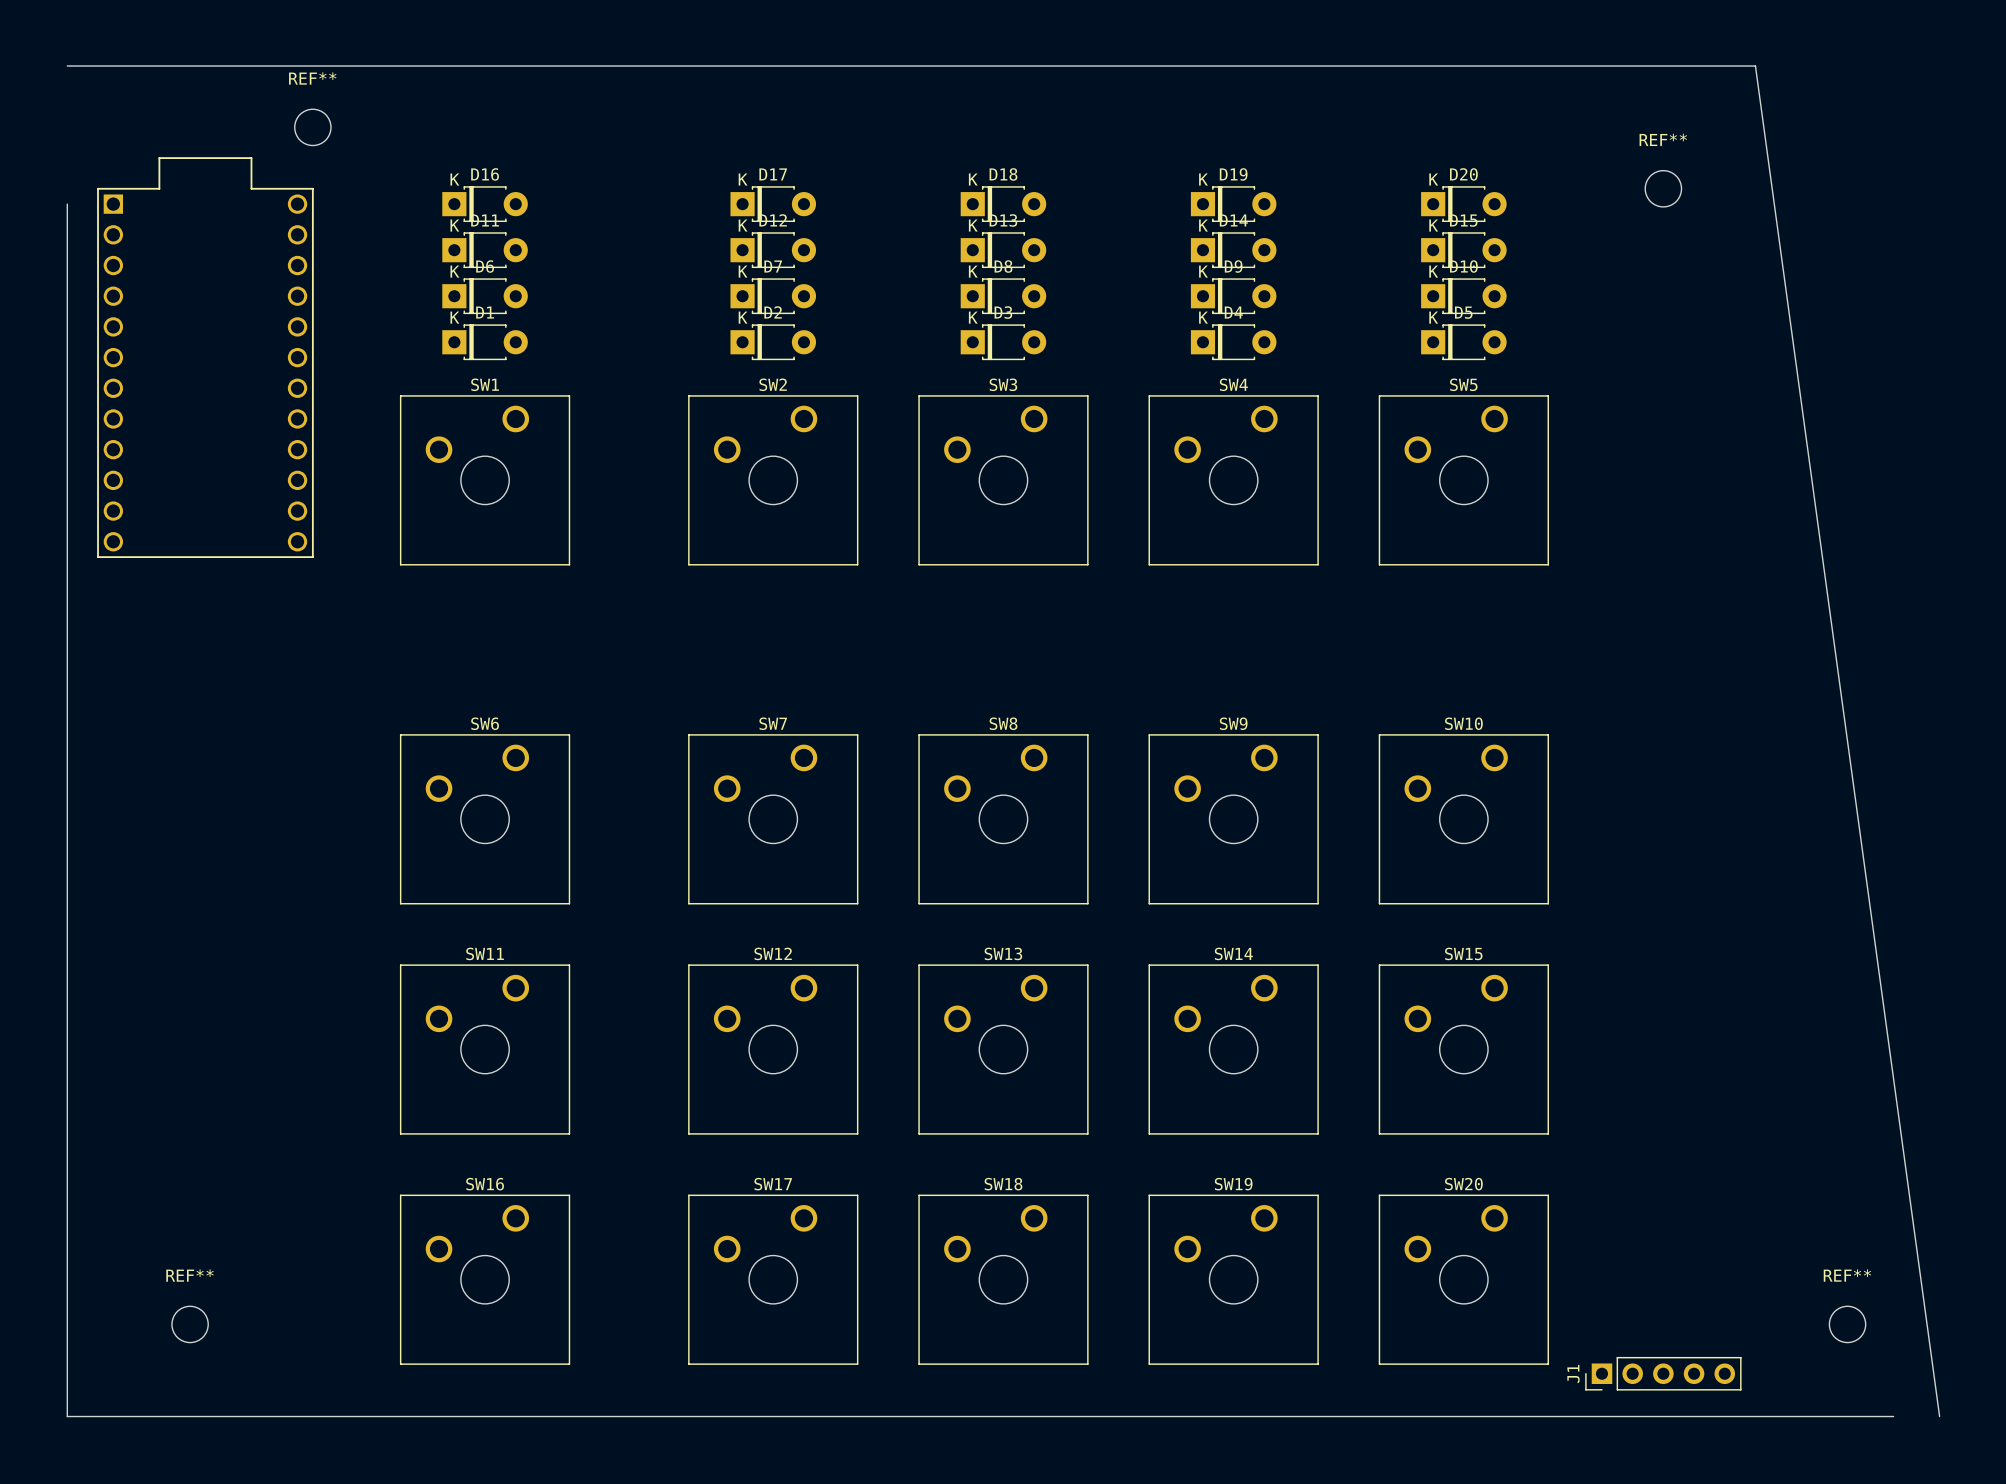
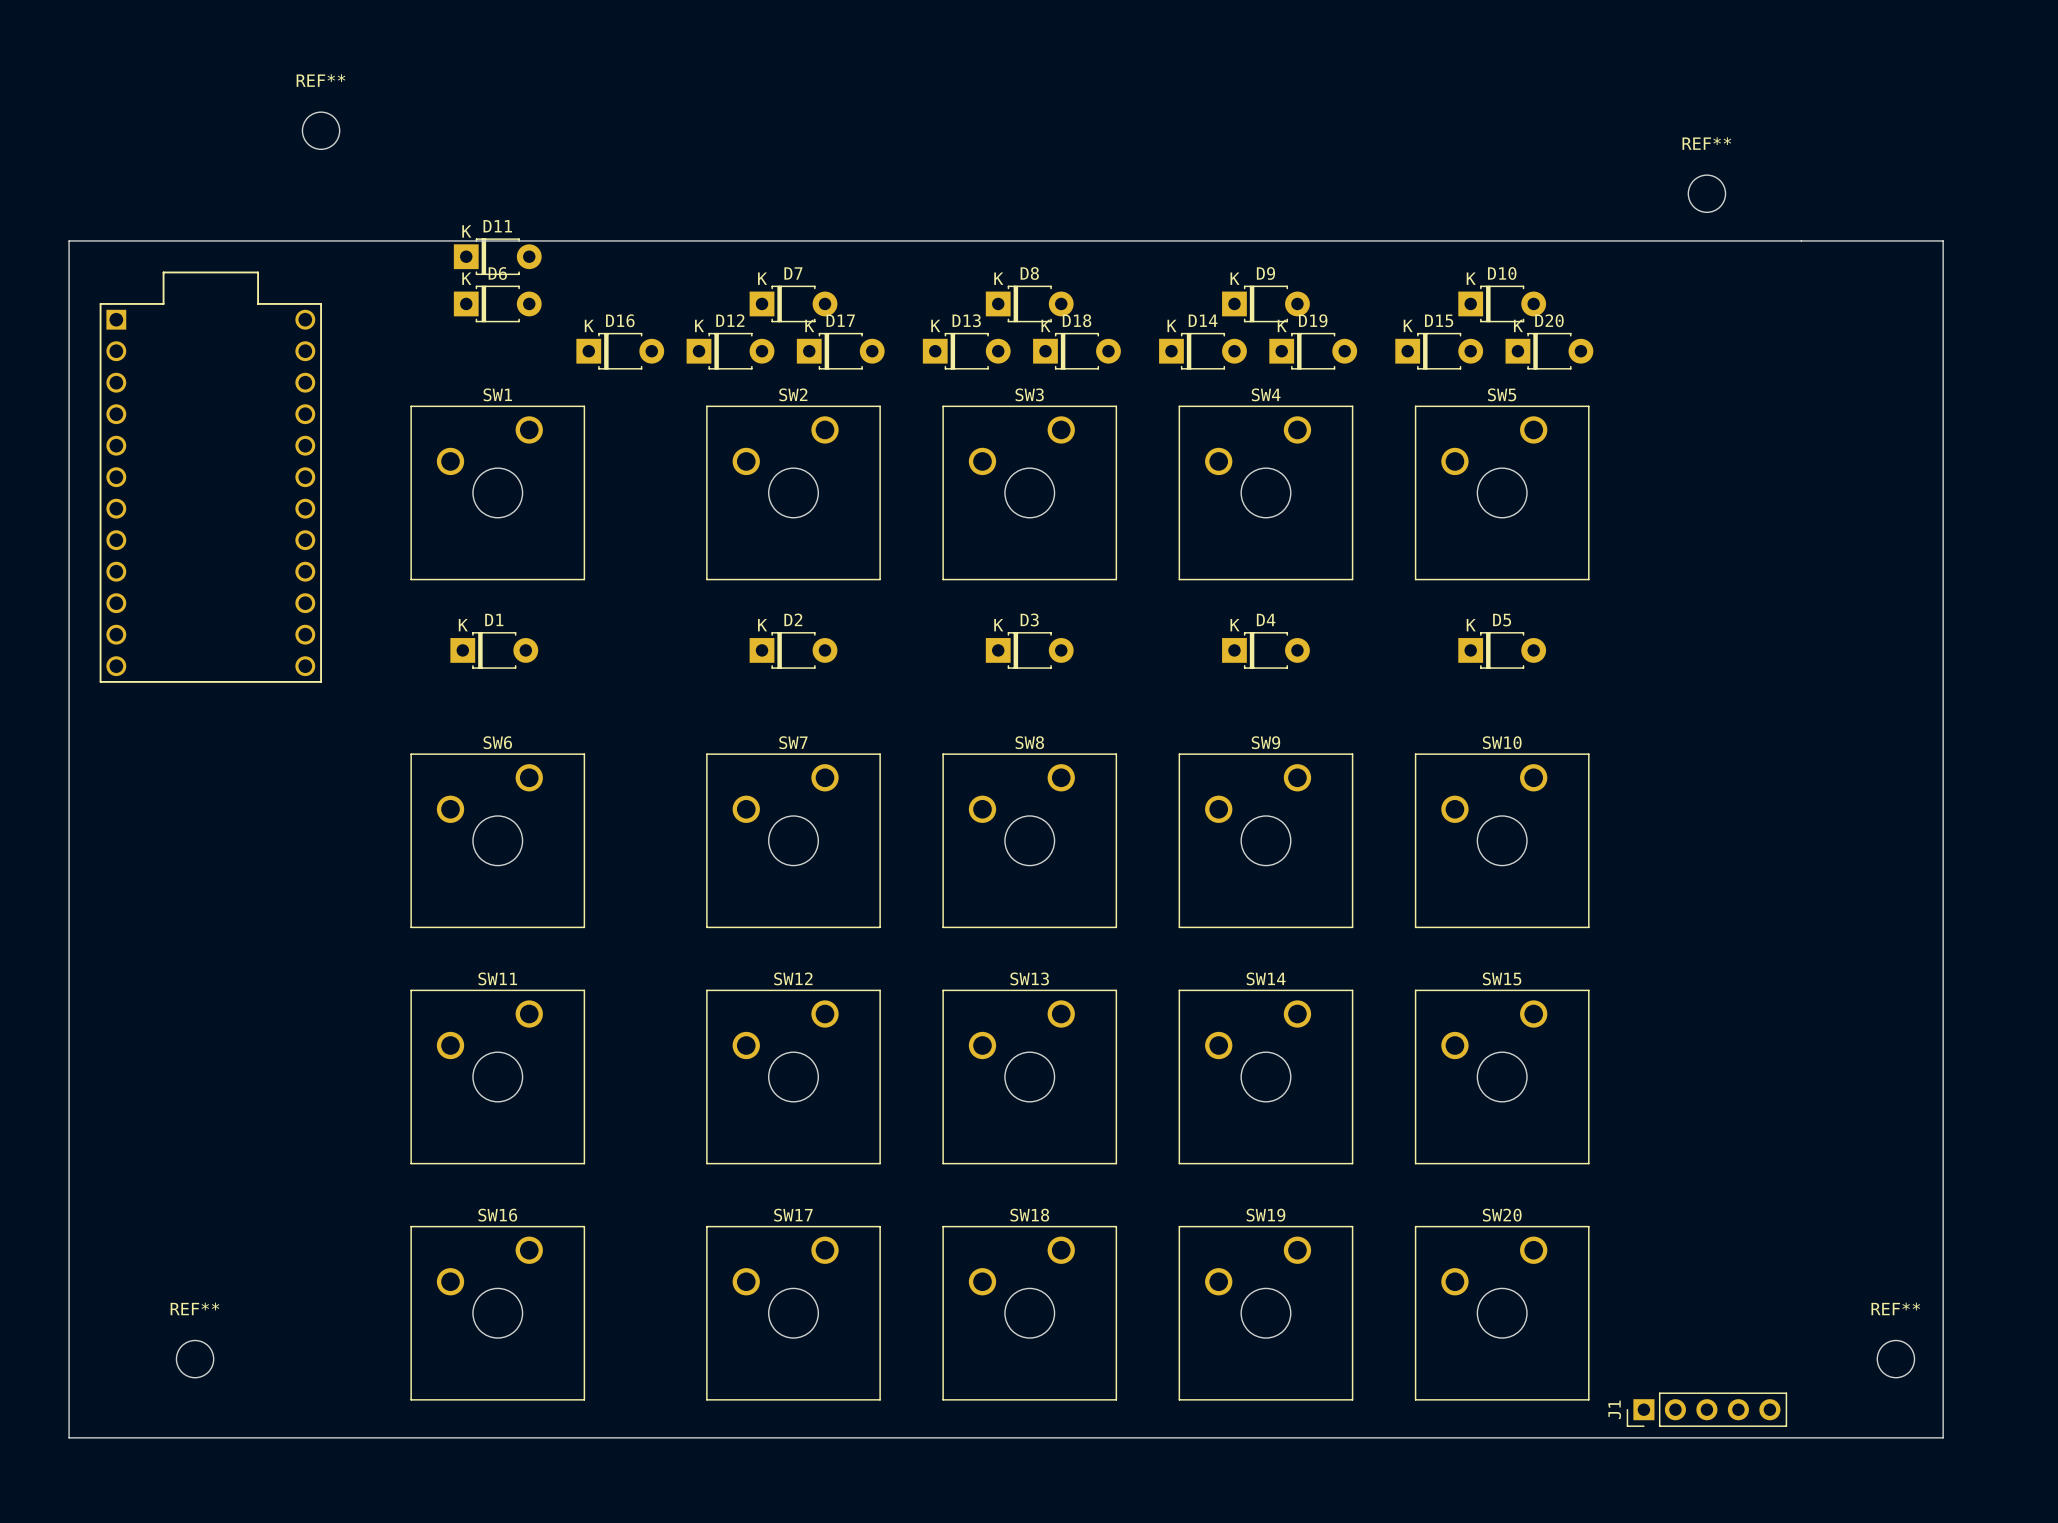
board edge: (67, 66) (1755, 66) (1939, 1416) -> none
board edge: (67, 204) (67, 234) -> (69, 1437) (1943, 1437) (1943, 240) (69, 240)
D16 position: (485, 204) -> (620, 351)
D17 position: (773, 204) -> (840, 351)
D18 position: (1003, 204) -> (1076, 351)
D19 position: (1233, 204) -> (1313, 351)
D20 position: (1463, 204) -> (1549, 351)
D12 position: (773, 250) -> (730, 351)
D13 position: (1003, 250) -> (966, 351)
D14 position: (1233, 250) -> (1202, 351)
D15 position: (1463, 250) -> (1439, 351)
D1 position: (485, 342) -> (494, 650)
D2 position: (773, 342) -> (793, 650)
D3 position: (1003, 342) -> (1029, 650)
D4 position: (1233, 342) -> (1265, 650)
D5 position: (1463, 342) -> (1502, 650)
part position: (205, 357) -> (210, 477)
board edge: (67, 1401) (67, 1416) (1893, 1416) -> none

